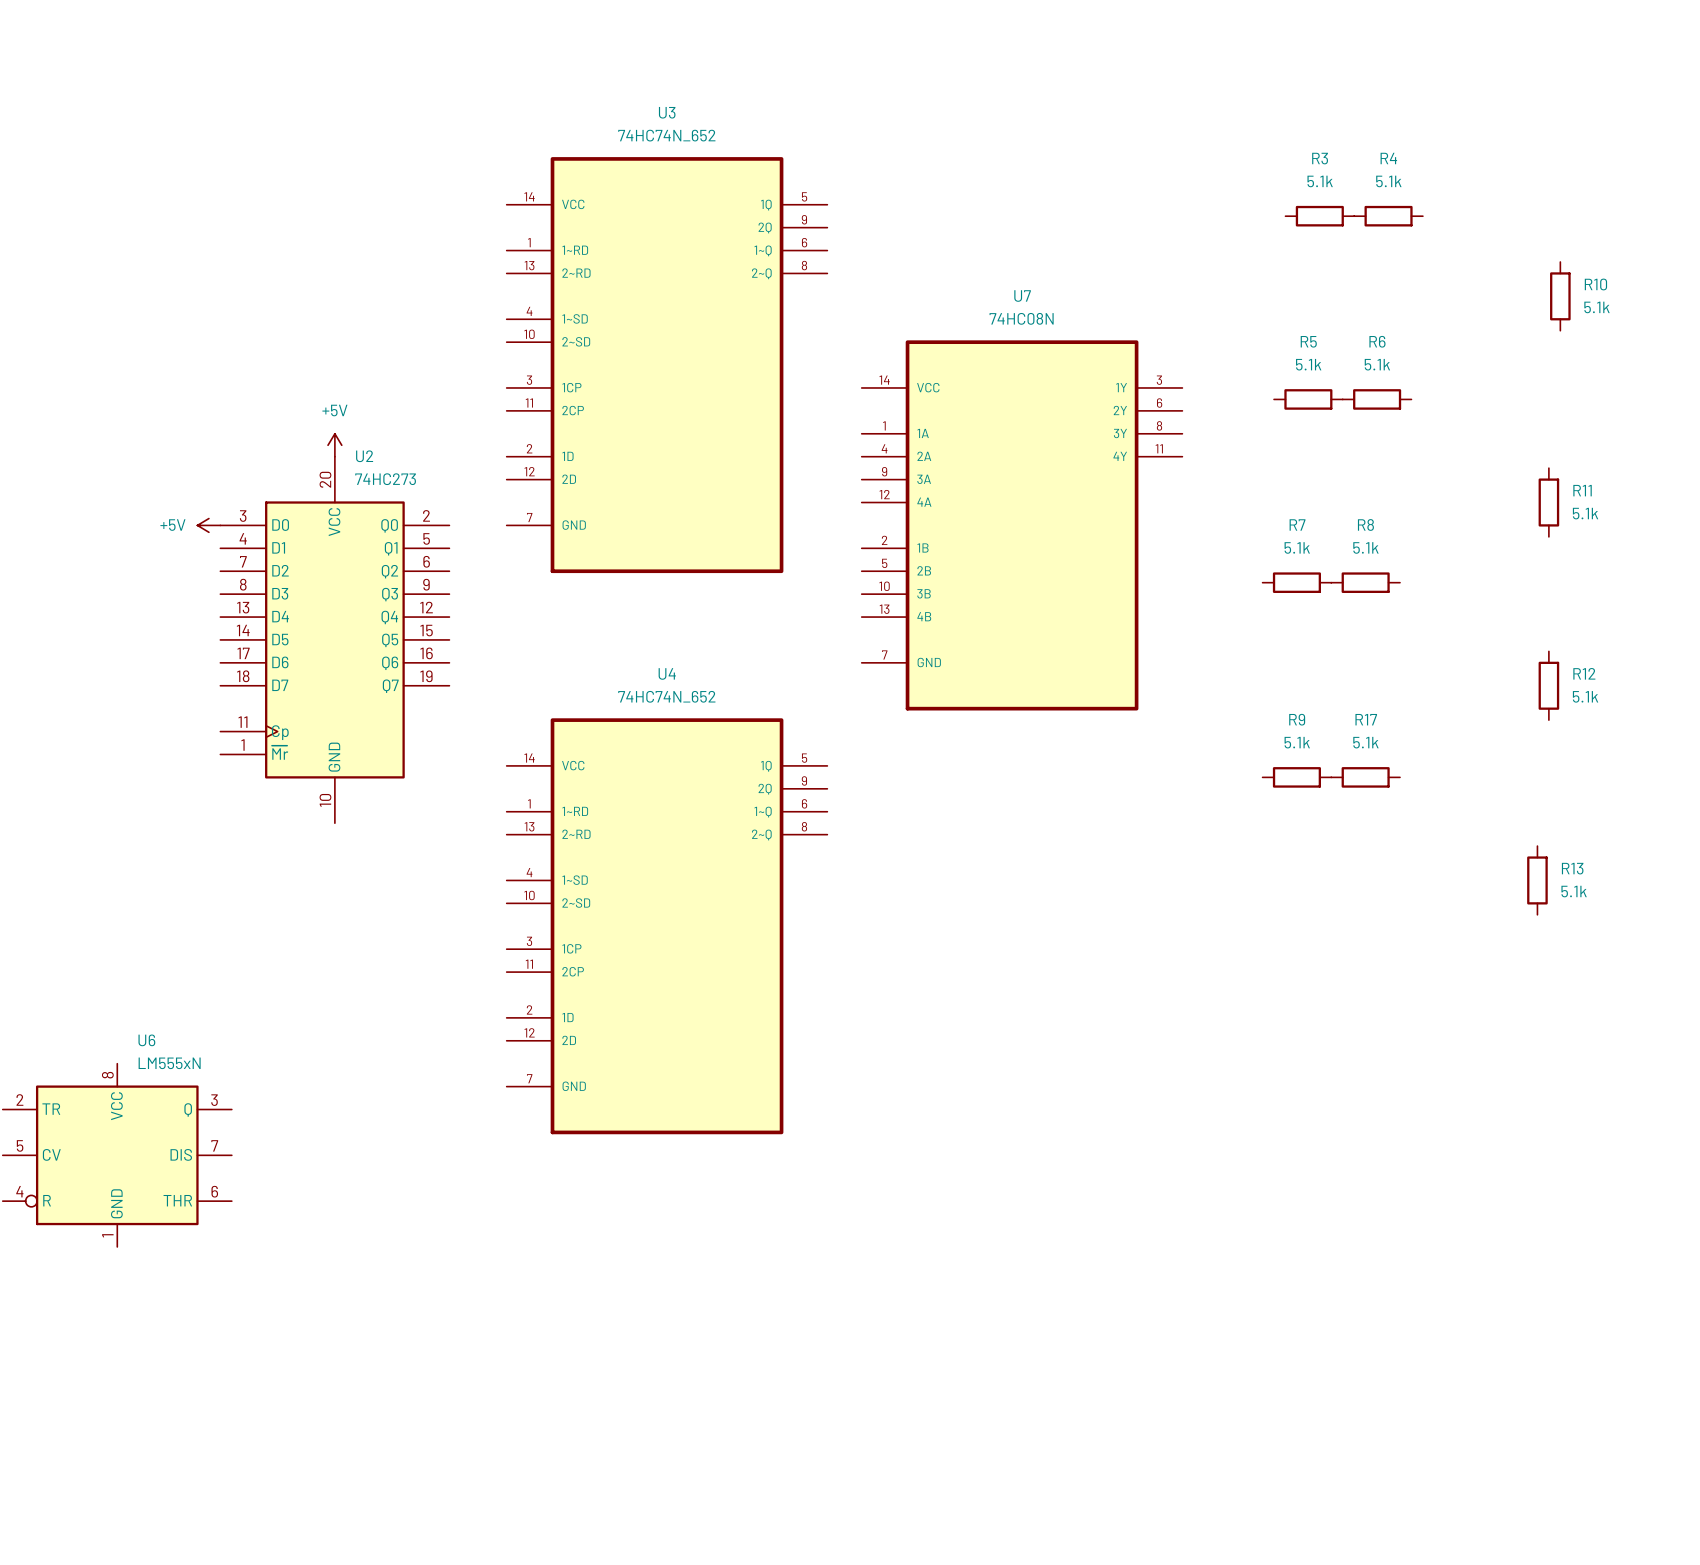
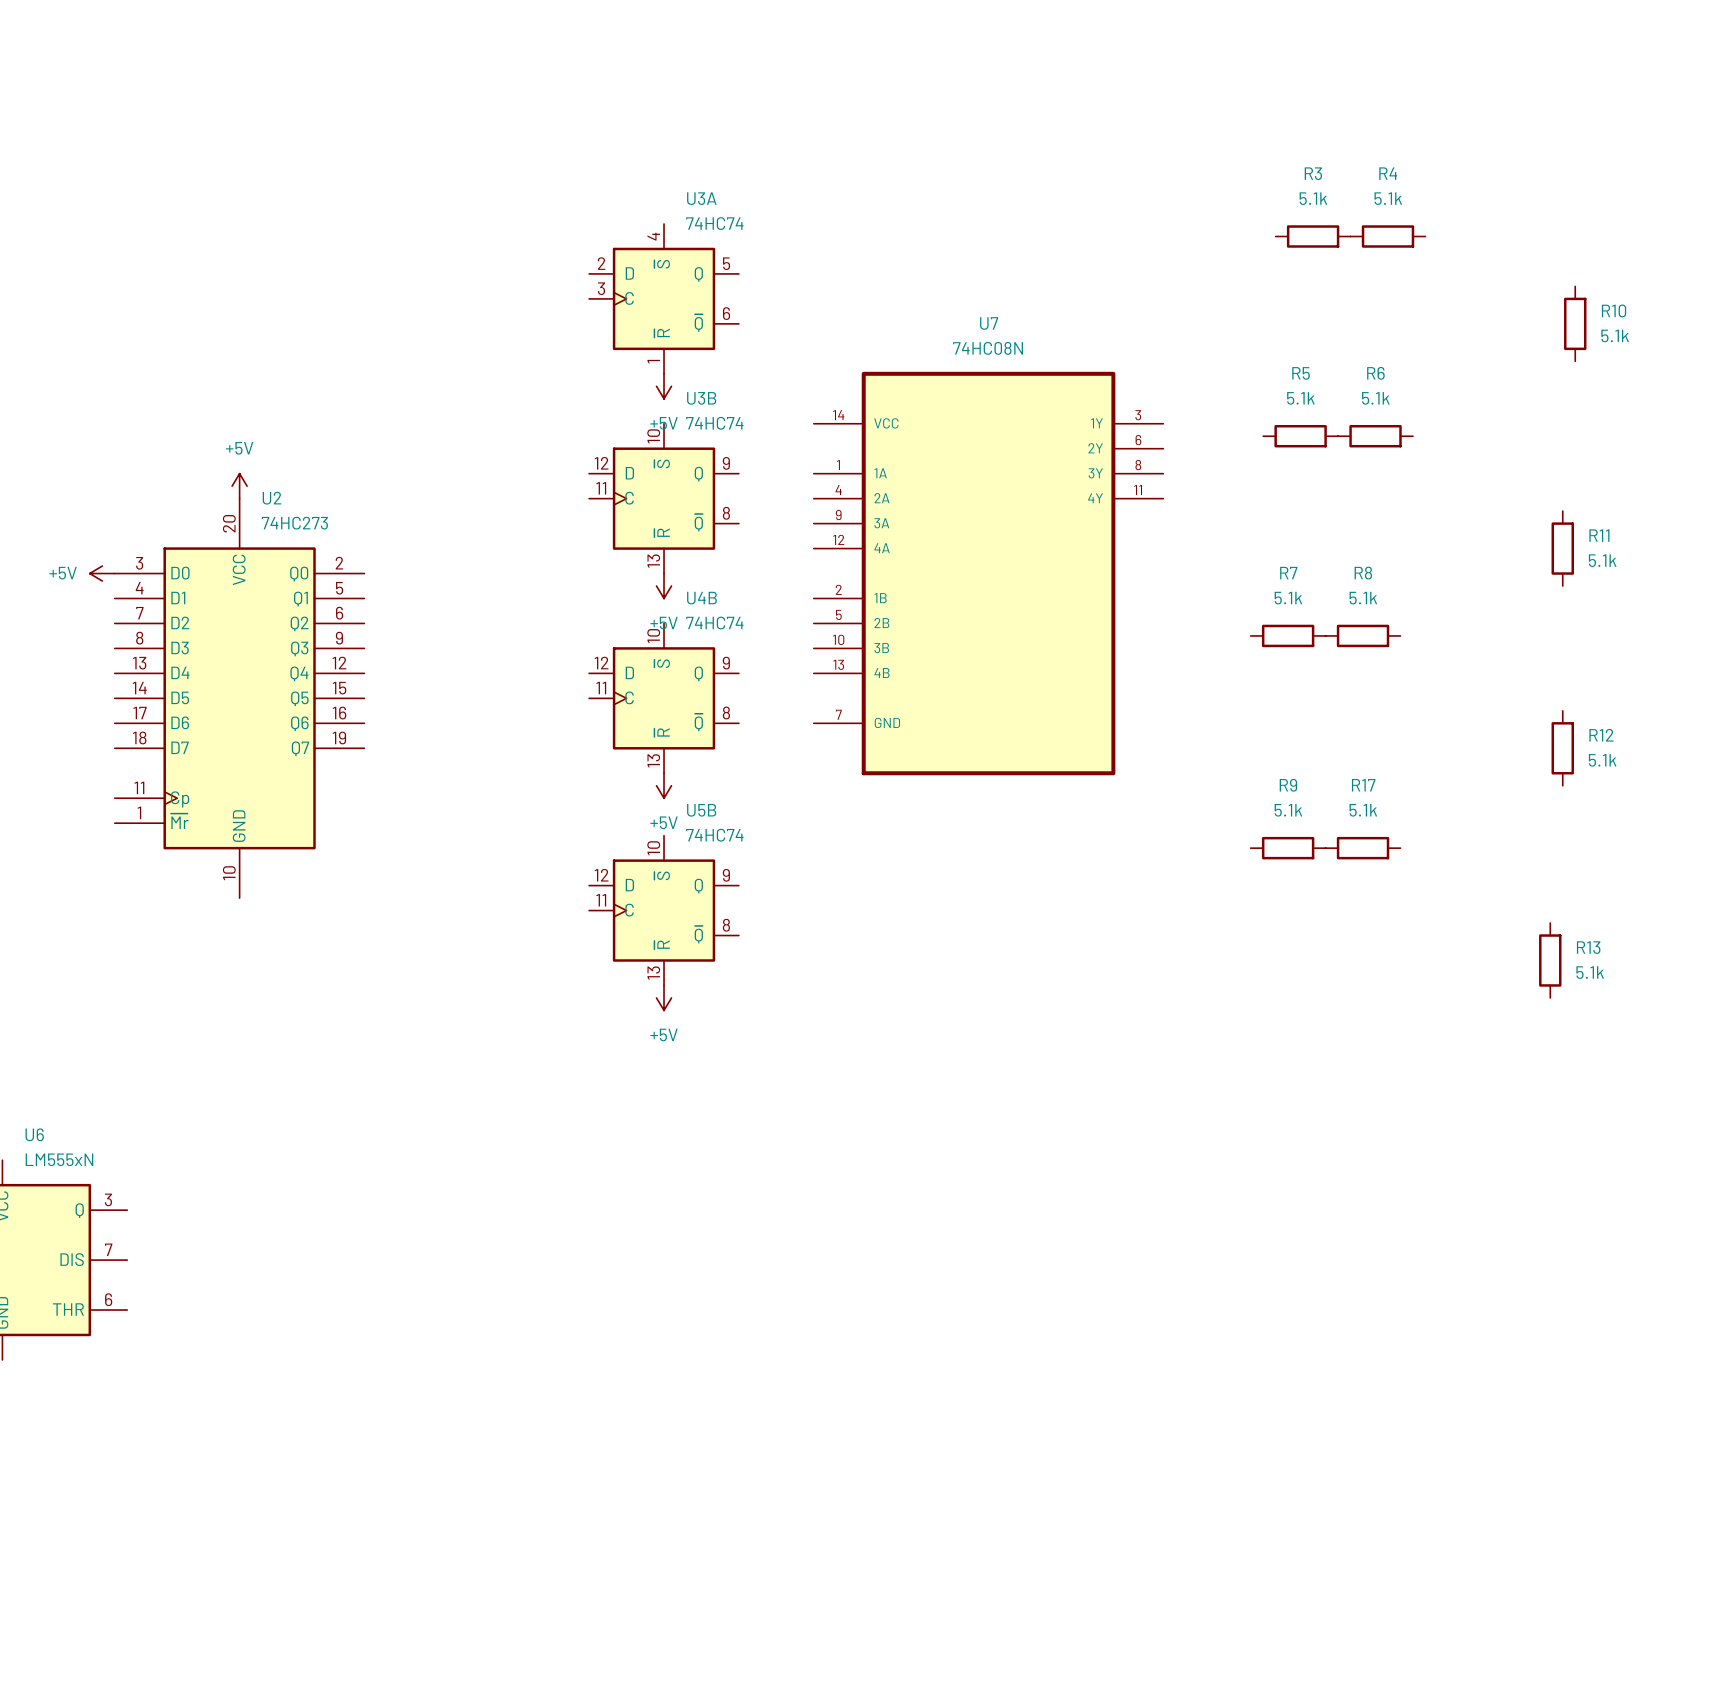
U3A: none -> 74HC74 (664, 298)
power symbol: none -> +5V (664, 386)
U3: 74HC74N_652 (667, 365) -> none
U3B: none -> 74HC74 (664, 498)
power symbol: none -> +5V (664, 586)
U4B: none -> 74HC74 (664, 698)
power symbol: none -> +5V (664, 785)
U5B: none -> 74HC74 (664, 910)
power symbol: none -> +5V (664, 997)
U4: 74HC74N_652 (667, 926) -> none

